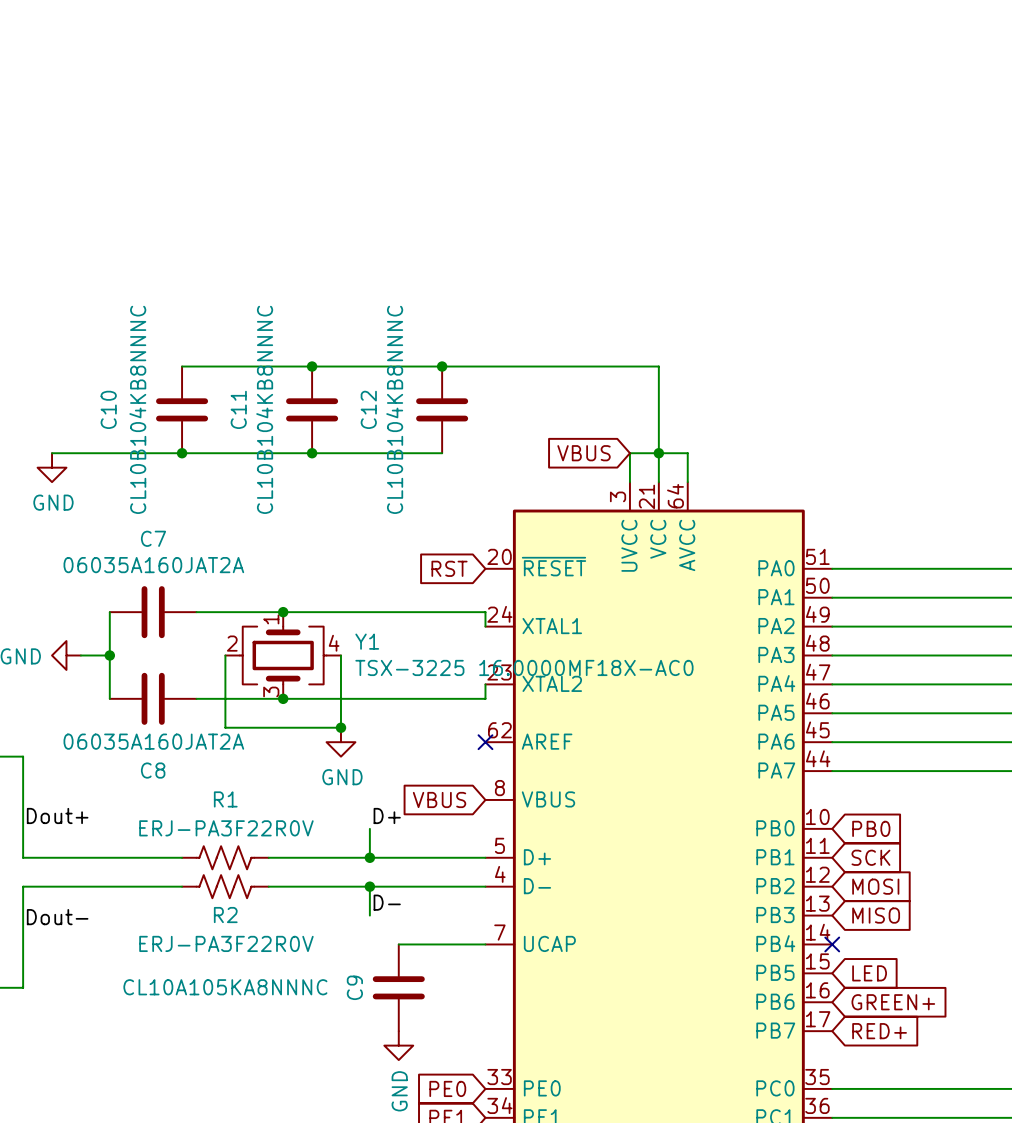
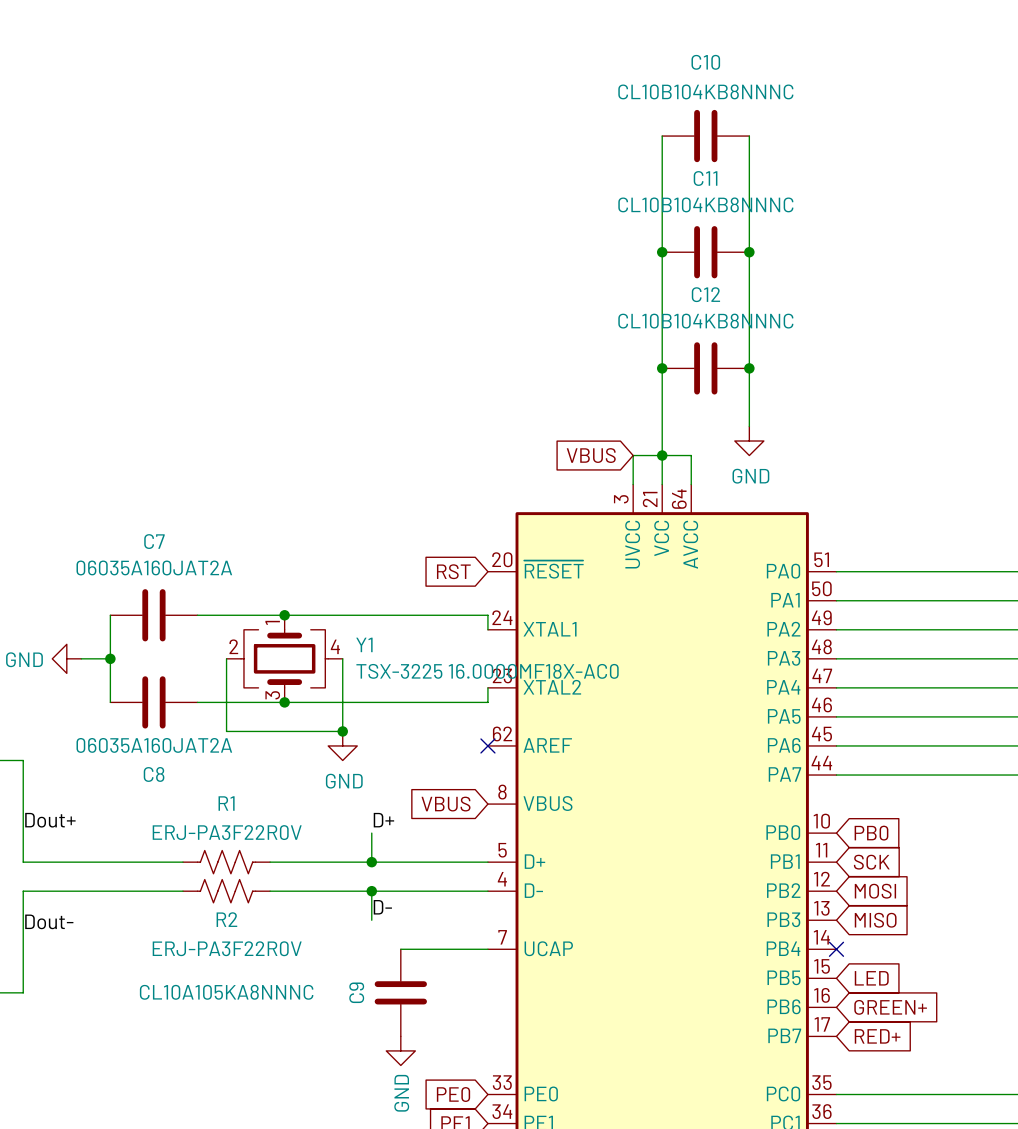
wire: none -> (749, 136) (749, 426)
junction: none -> (662, 252)
junction: none -> (749, 252)
wire: (182, 366) (658, 366) -> (662, 136) (662, 368)
junction: (312, 366) -> none
junction: (442, 366) -> none
junction: none -> (662, 368)
junction: none -> (749, 368)
C10 rotation: 0° (182, 409) -> 90° clockwise (705, 136)
C10 position: (182, 409) -> (705, 136)
C11 rotation: 0° (312, 409) -> 90° clockwise (705, 252)
C11 position: (312, 409) -> (705, 252)
C12 rotation: 0° (442, 409) -> 90° clockwise (705, 368)
C12 position: (442, 409) -> (705, 368)
power symbol: none -> GND (749, 441)
wire: (52, 453) (442, 453) -> none
junction: (182, 453) -> none
junction: (312, 453) -> none
power symbol: GND (52, 467) -> none

